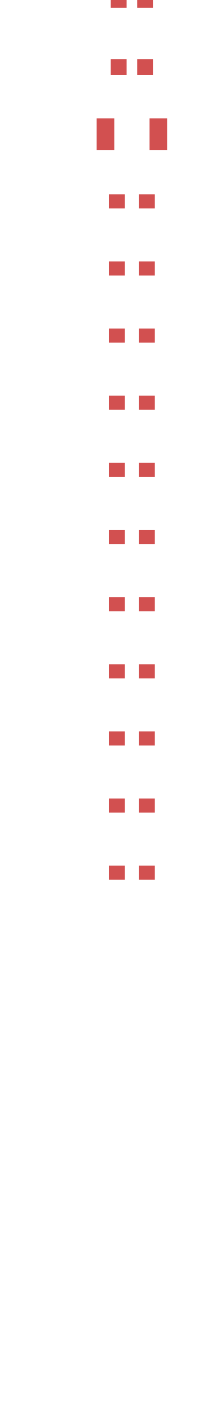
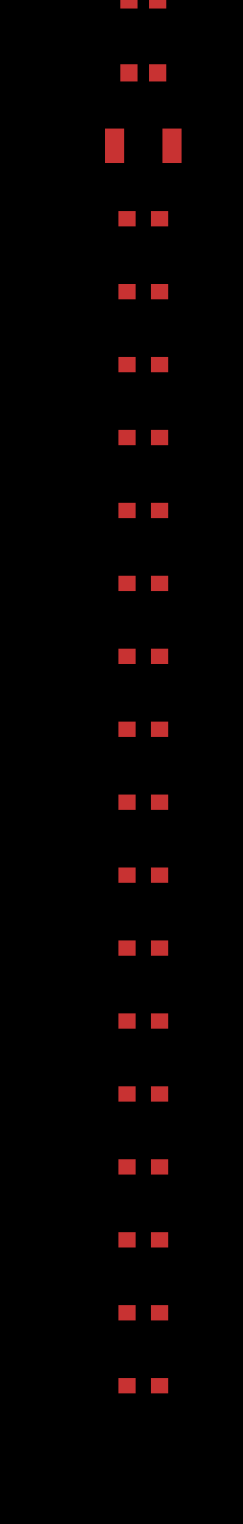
part: none -> (143, 1021)
part: none -> (143, 1093)
part: none -> (143, 1166)
part: none -> (143, 1239)
part: none -> (143, 1312)
part: none -> (143, 1385)

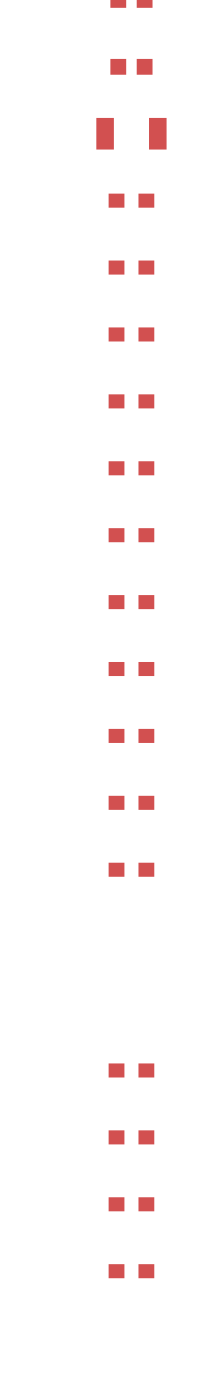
part: (143, 1021) -> none
part: (143, 1093) -> none

